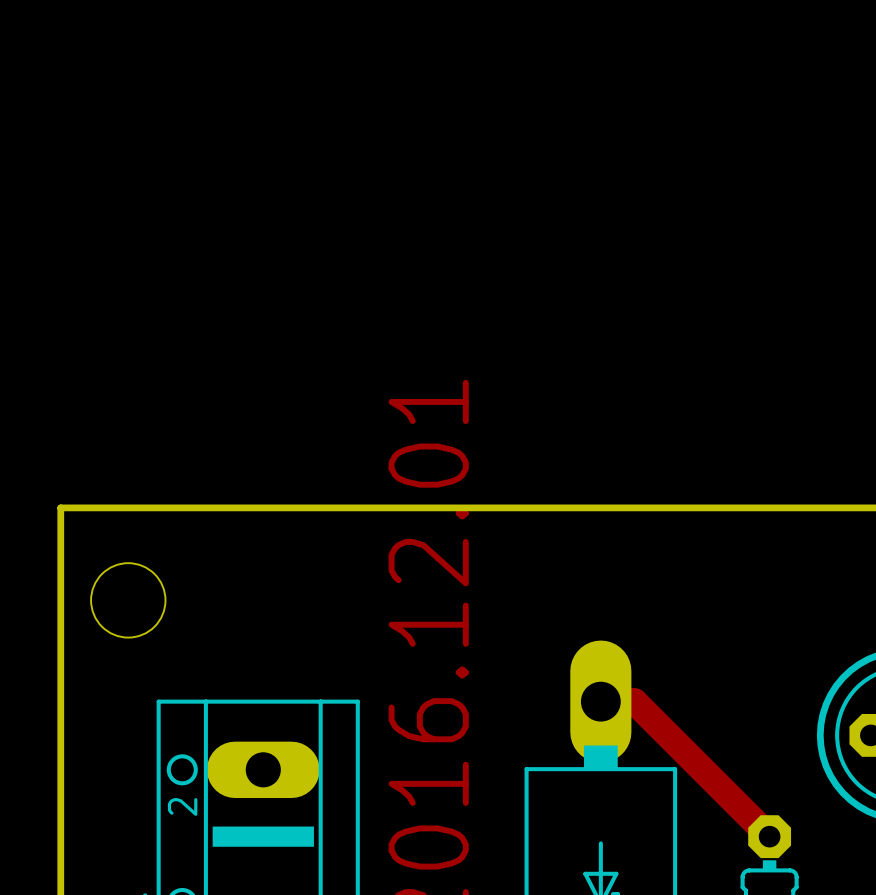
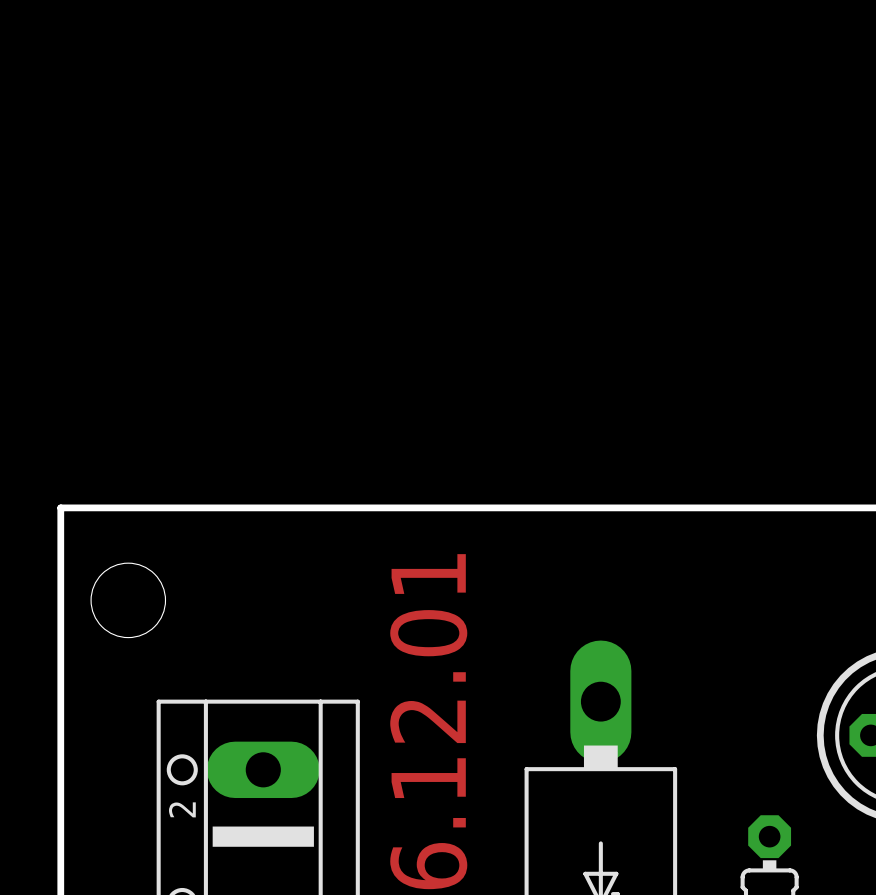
track: (600, 701) (634, 701) (769, 836) -> none

